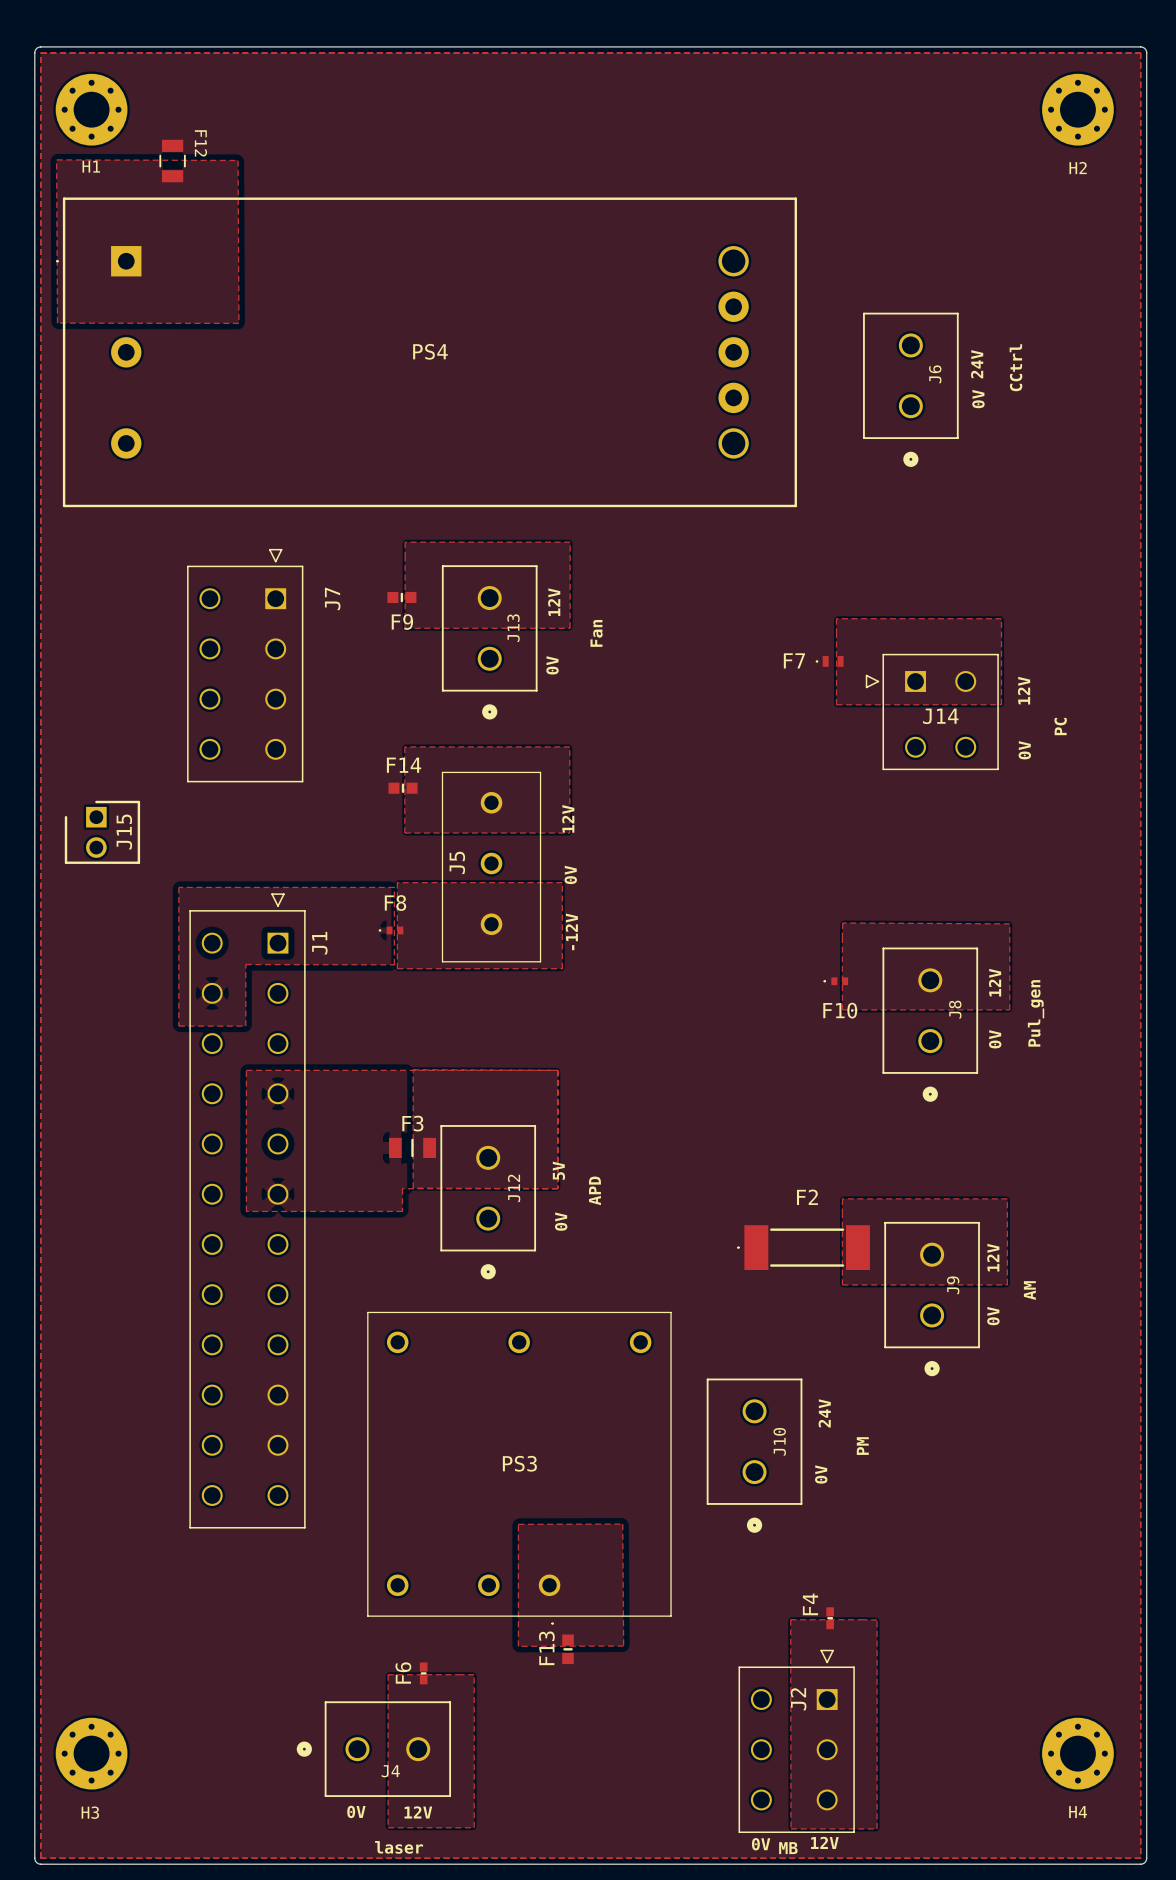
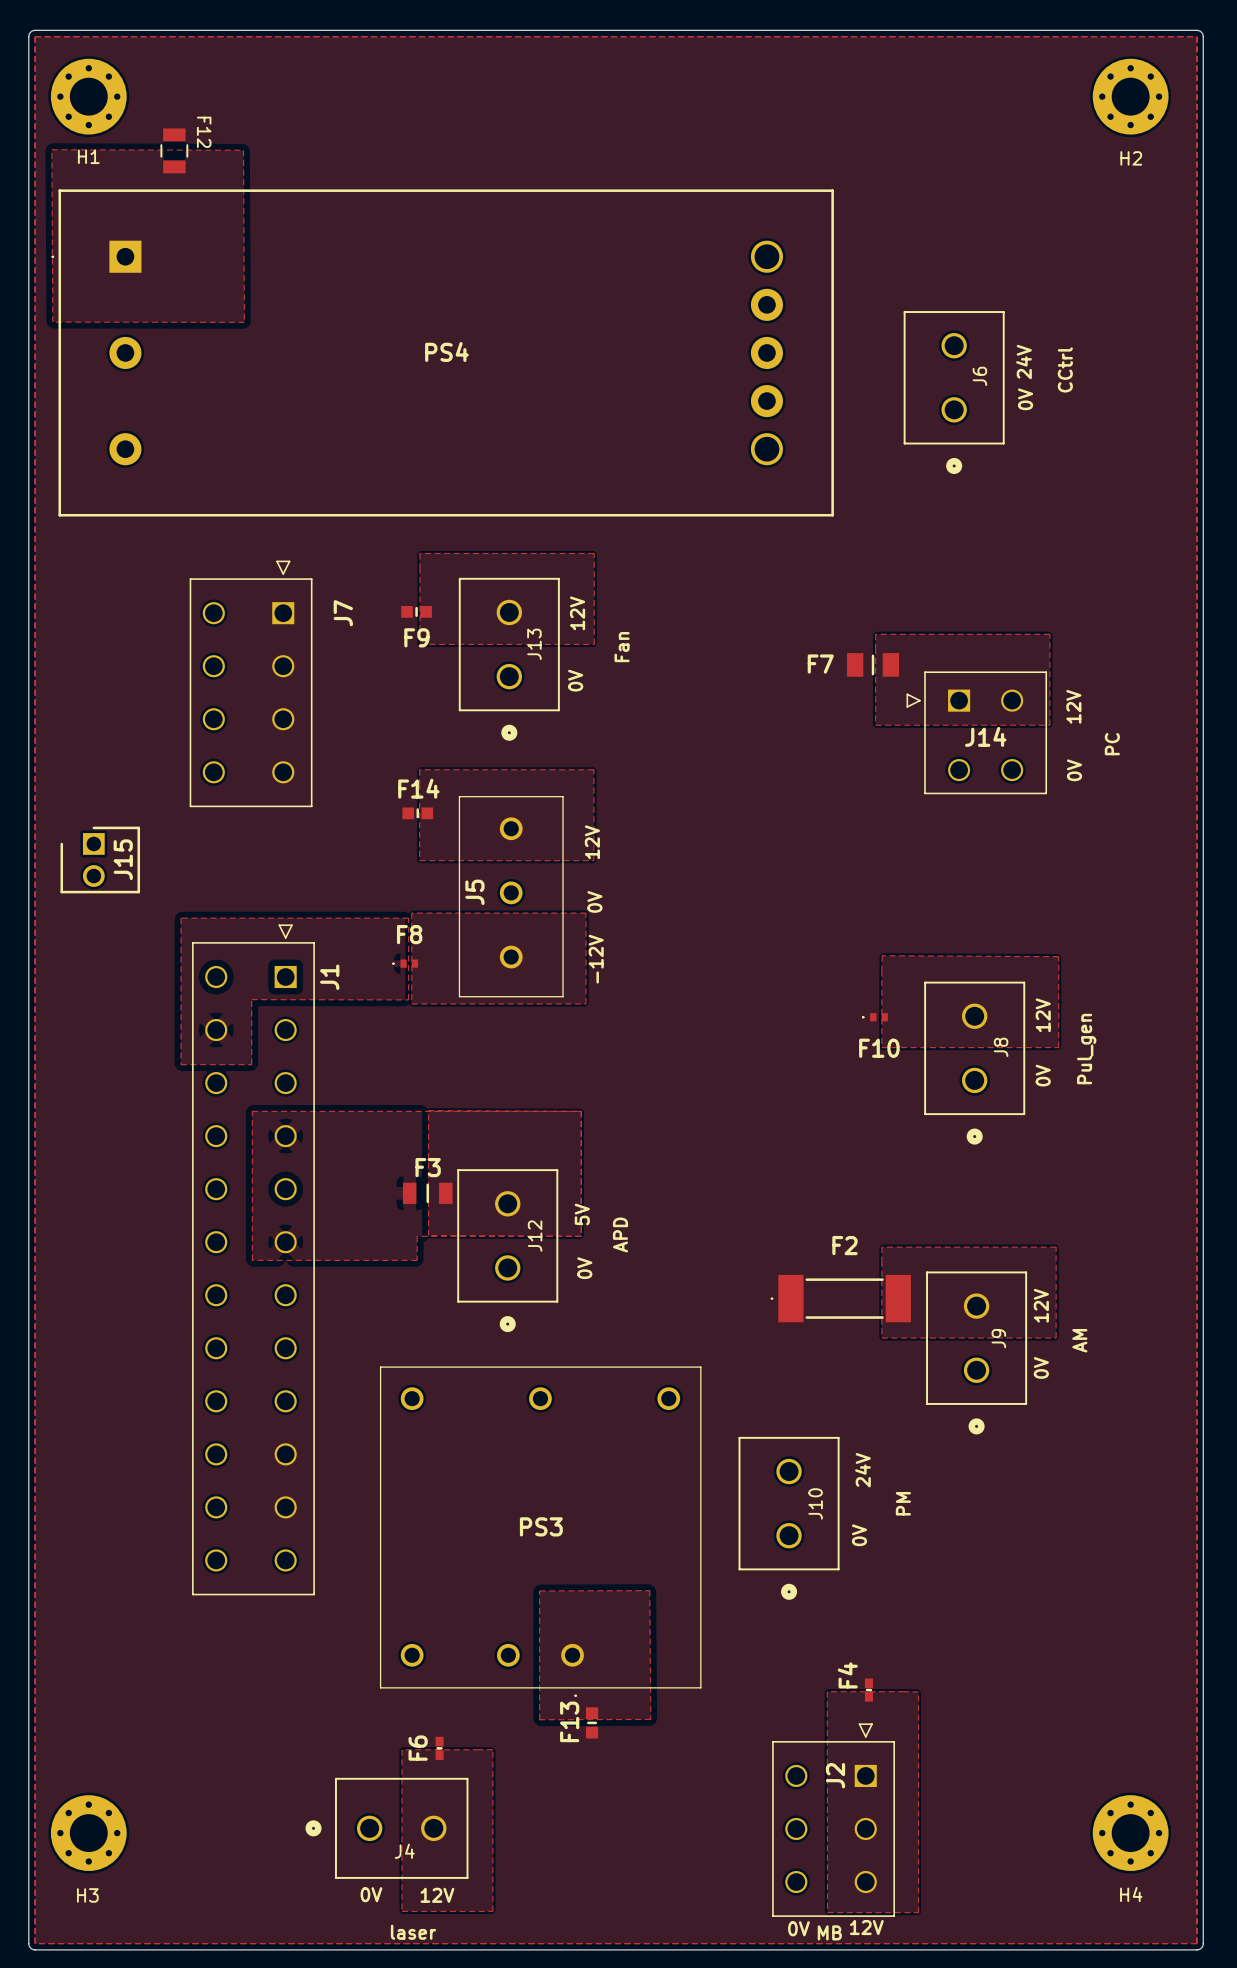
F7 footprint: [815, 656, 844, 667] -> [847, 653, 900, 677]

